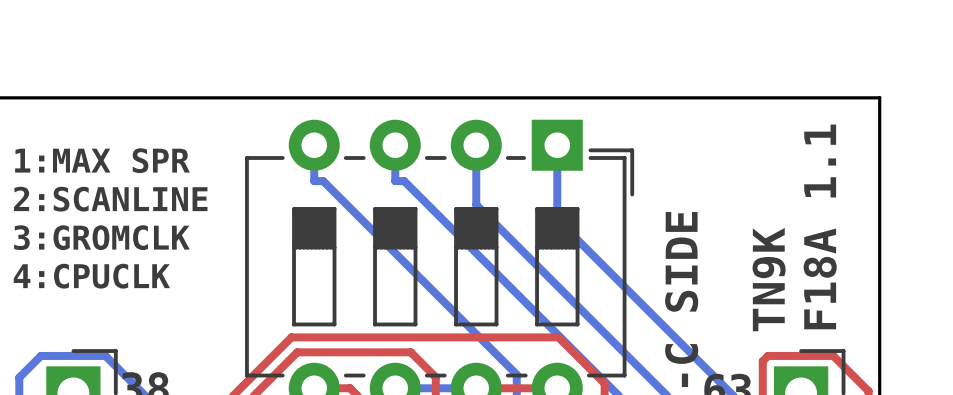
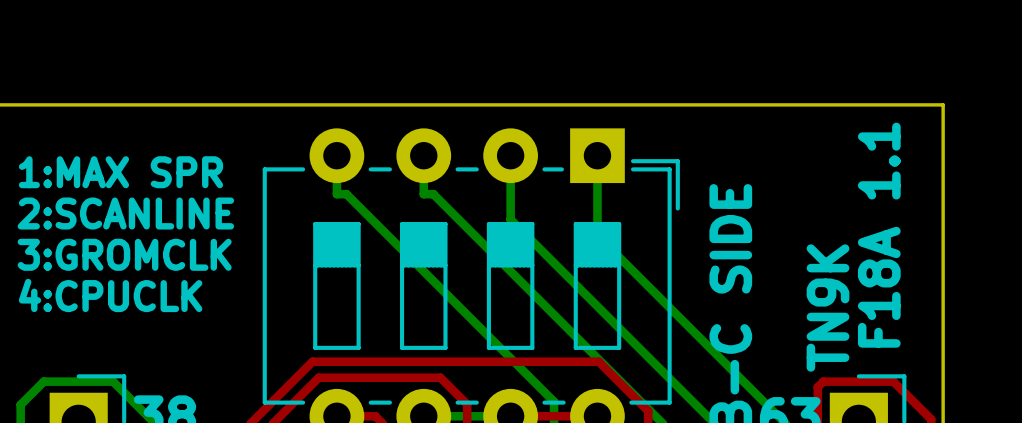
text position: TN9K (769, 279) -> TN9K (828, 308)

